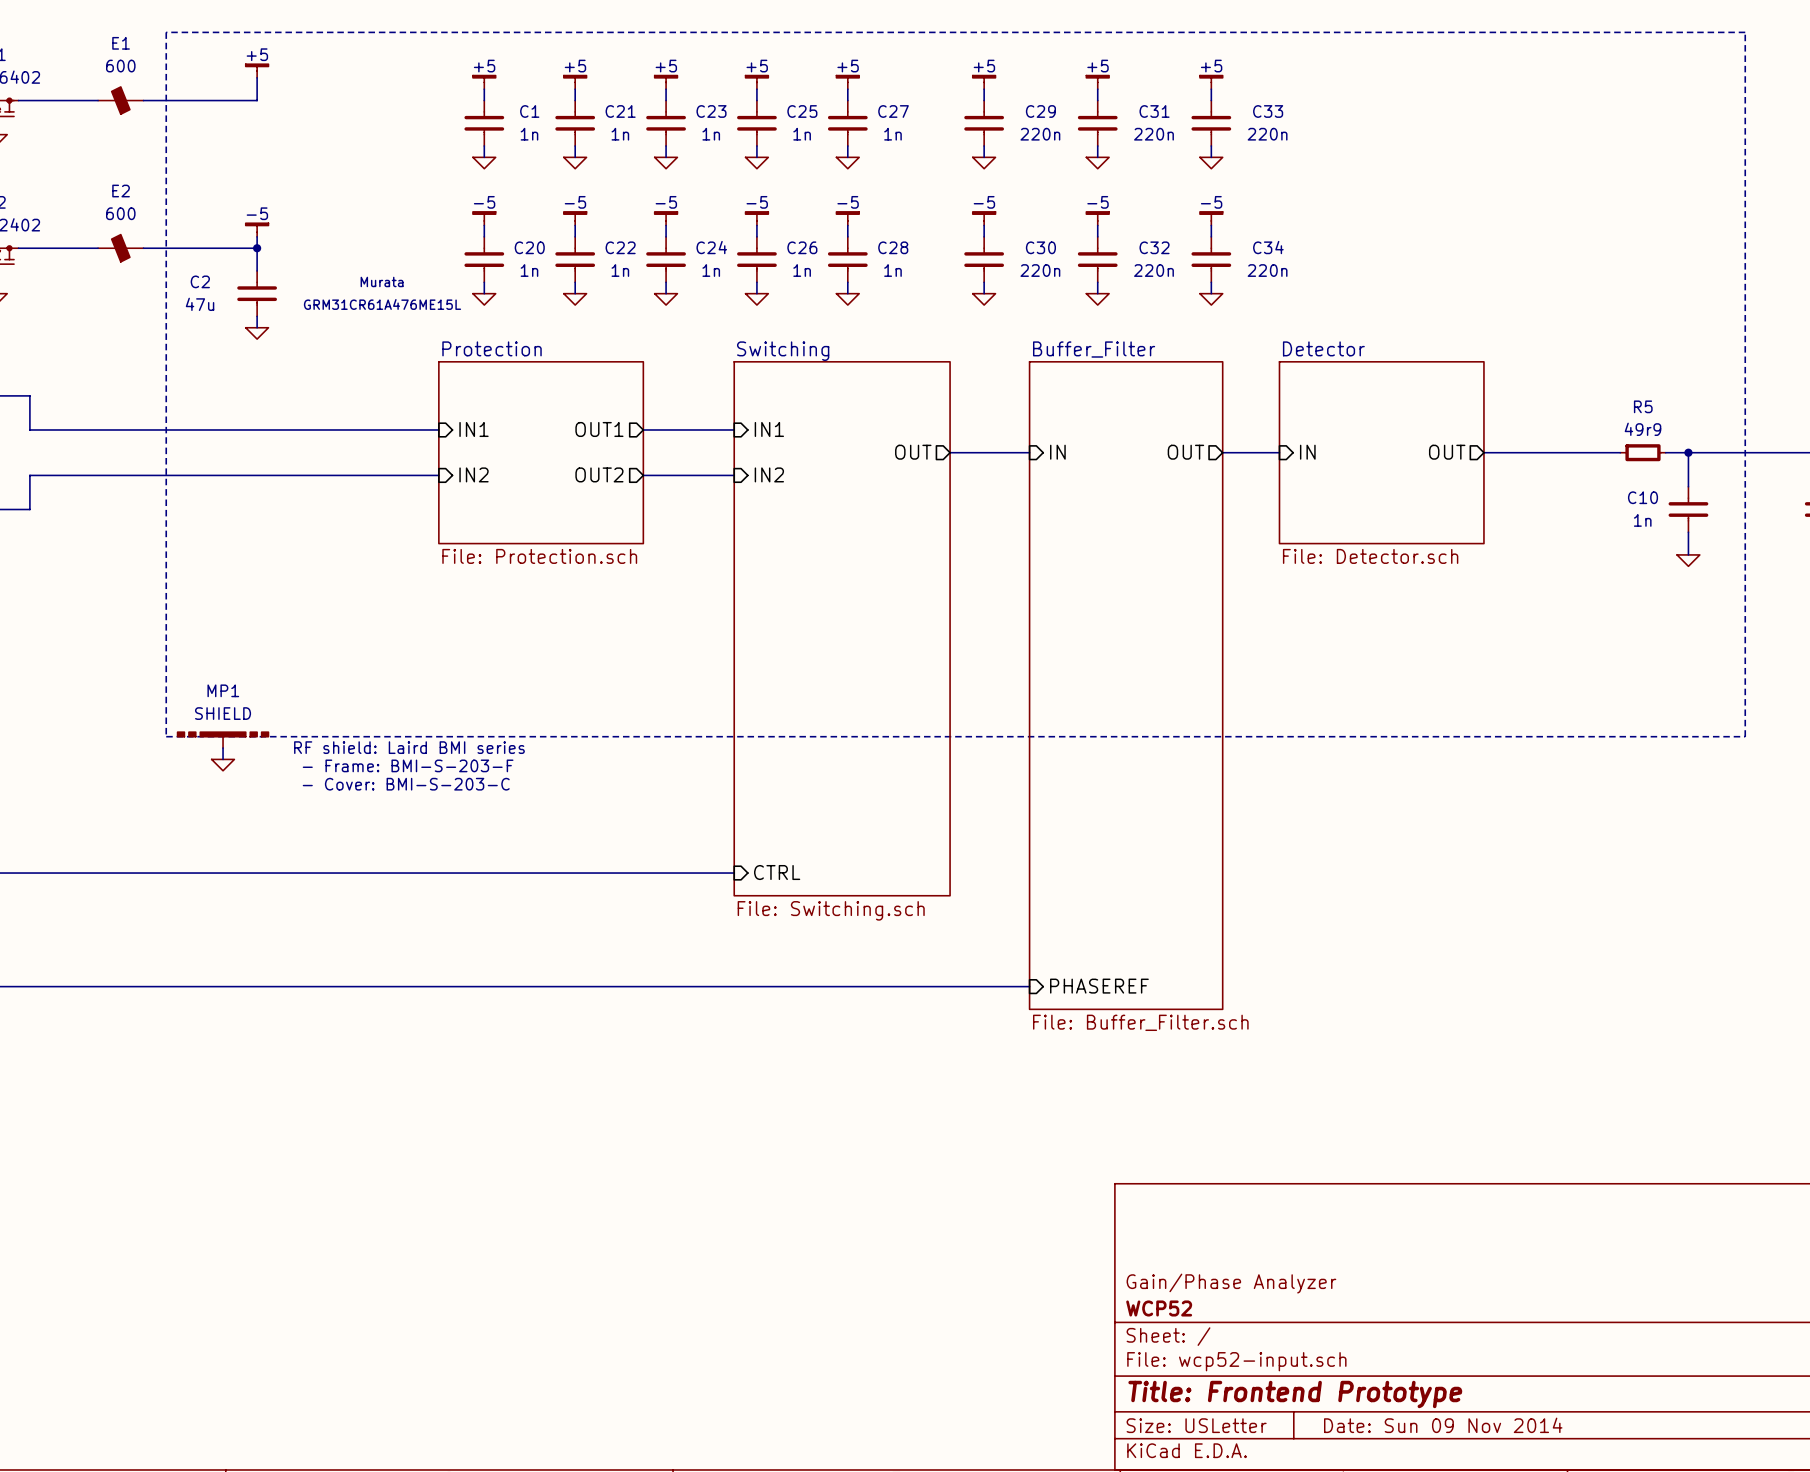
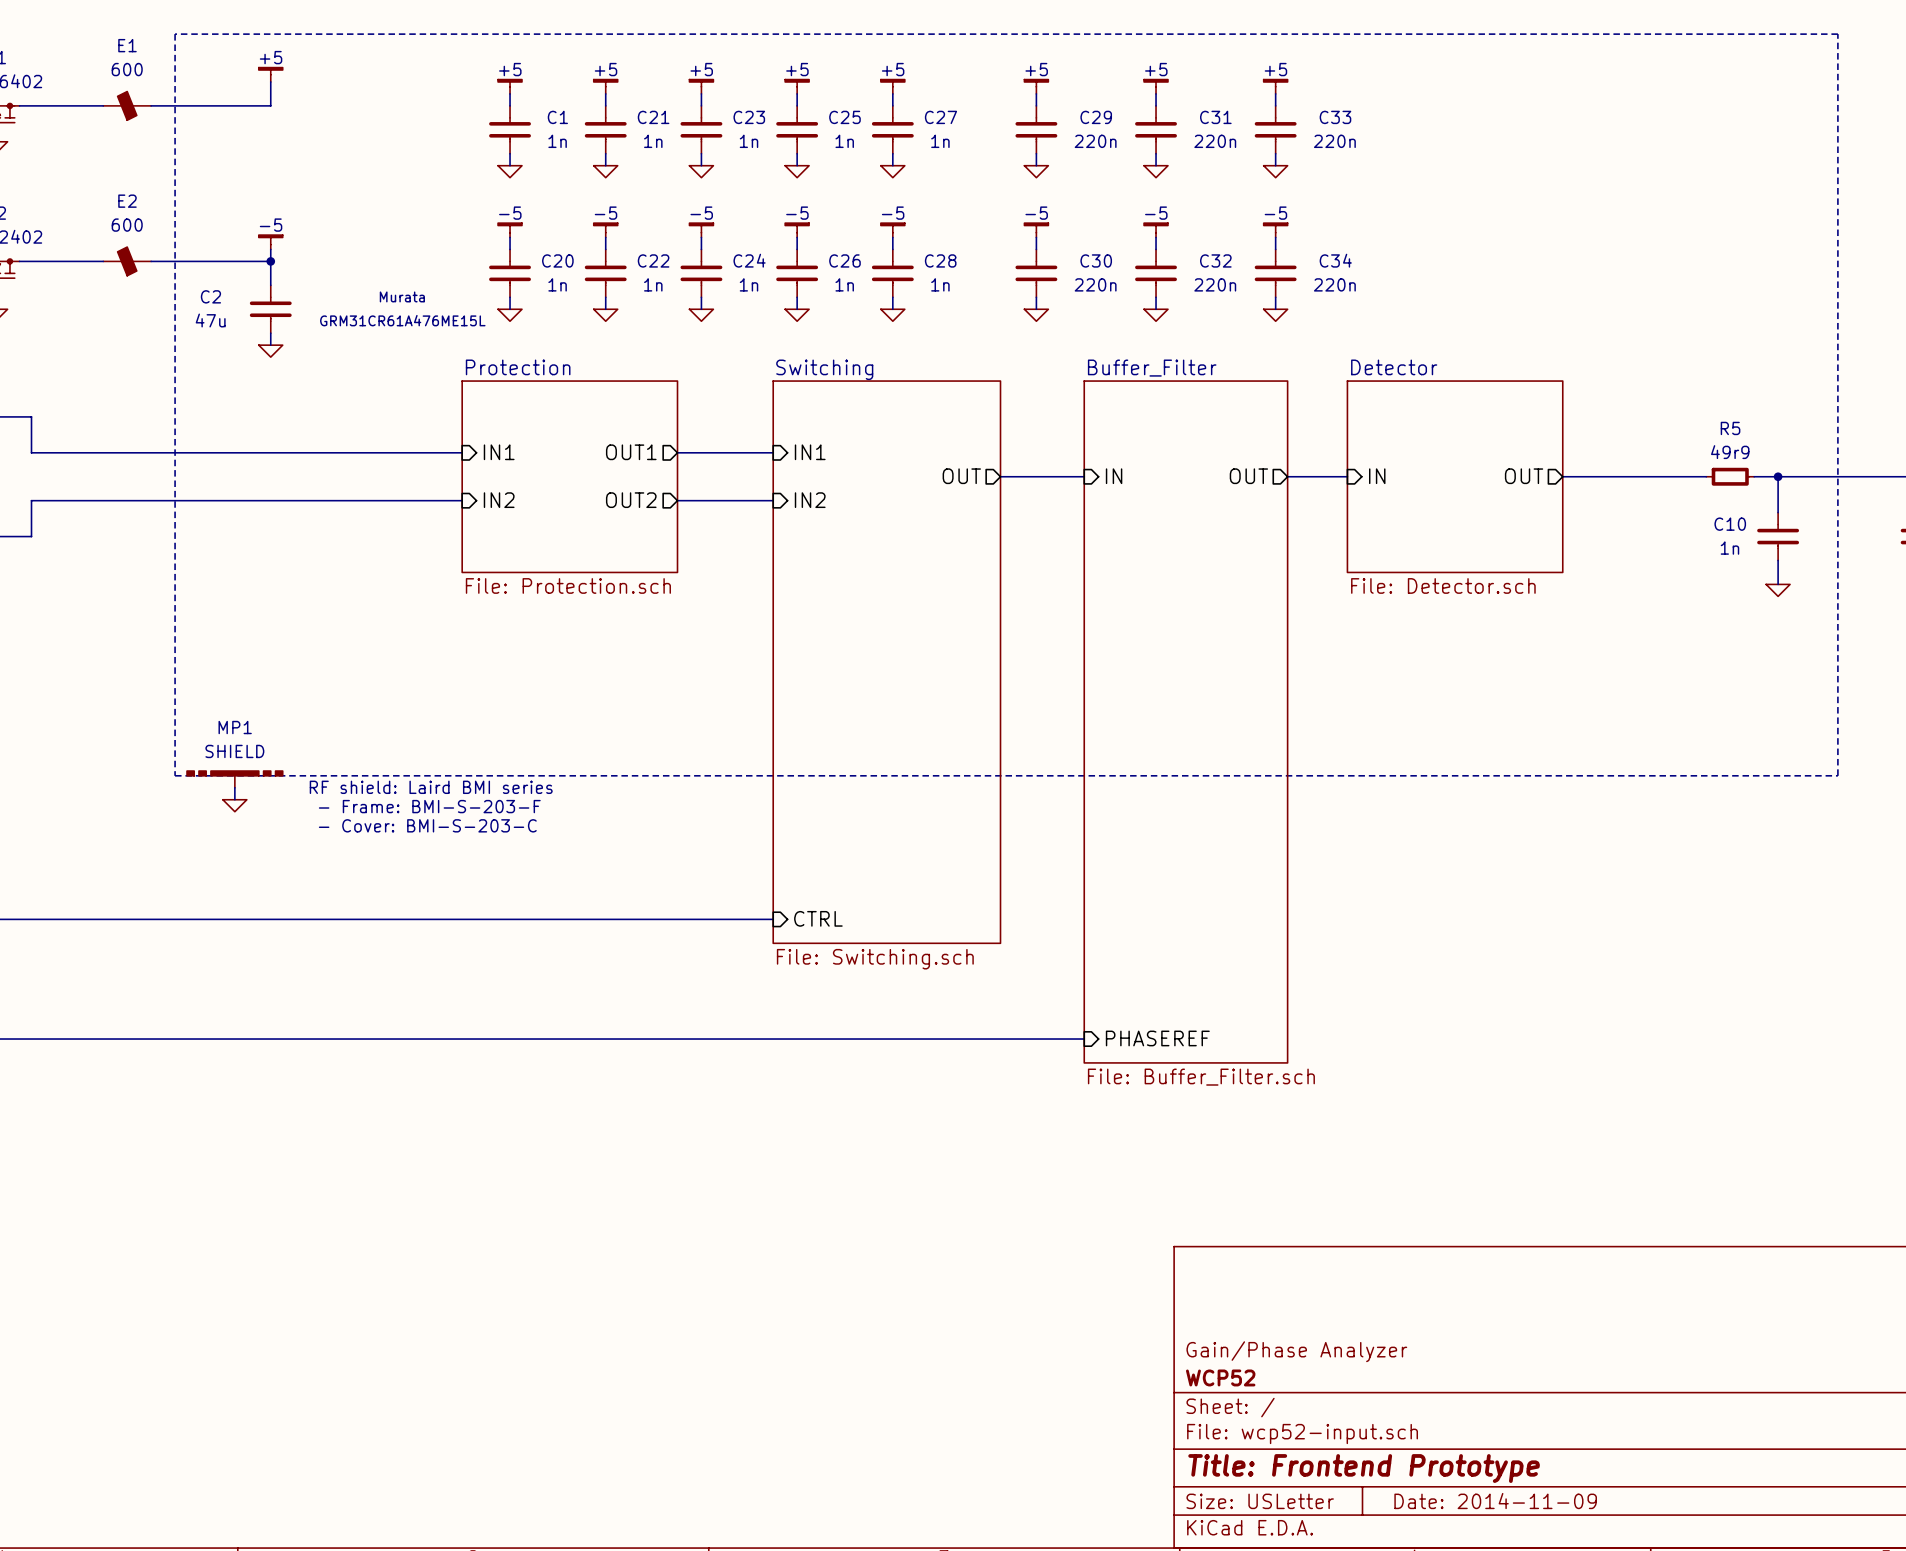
title block: Date: Sun 09 Nov 2014 (1443, 1425) -> Date: 2014-11-09 (1495, 1501)

